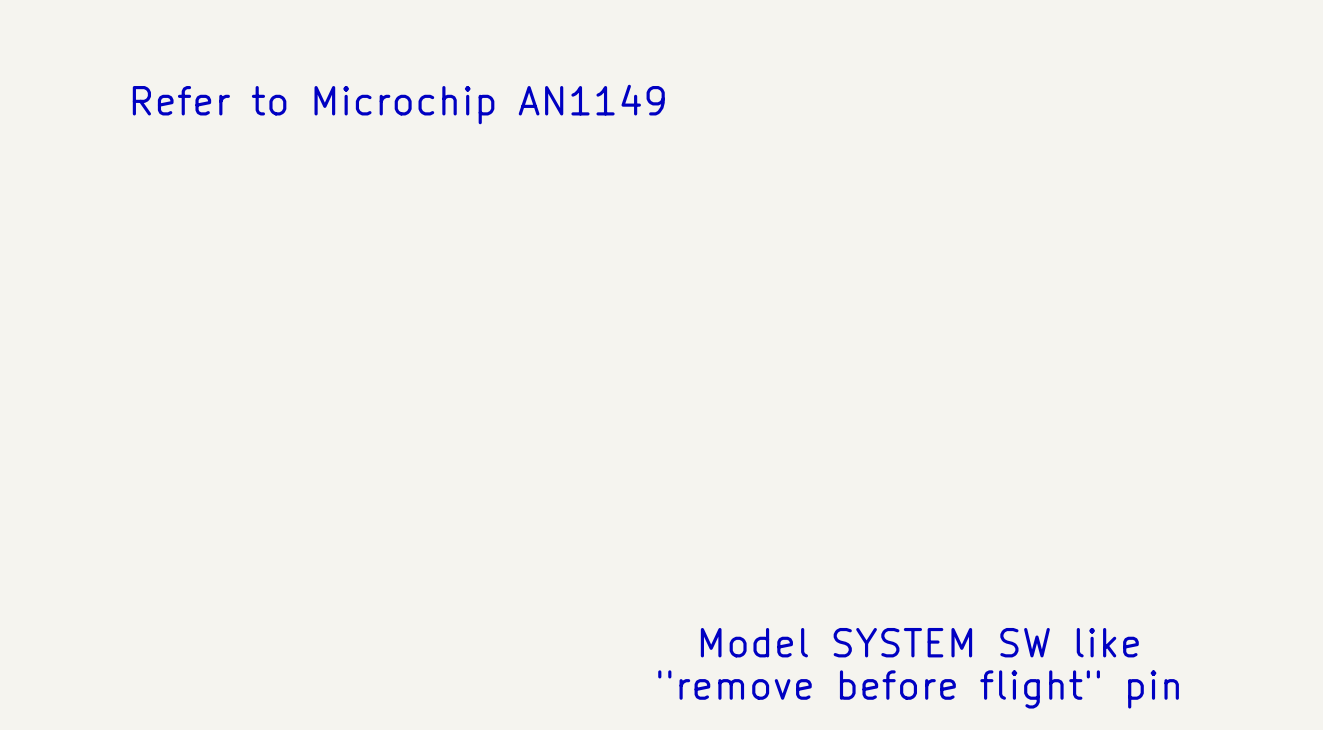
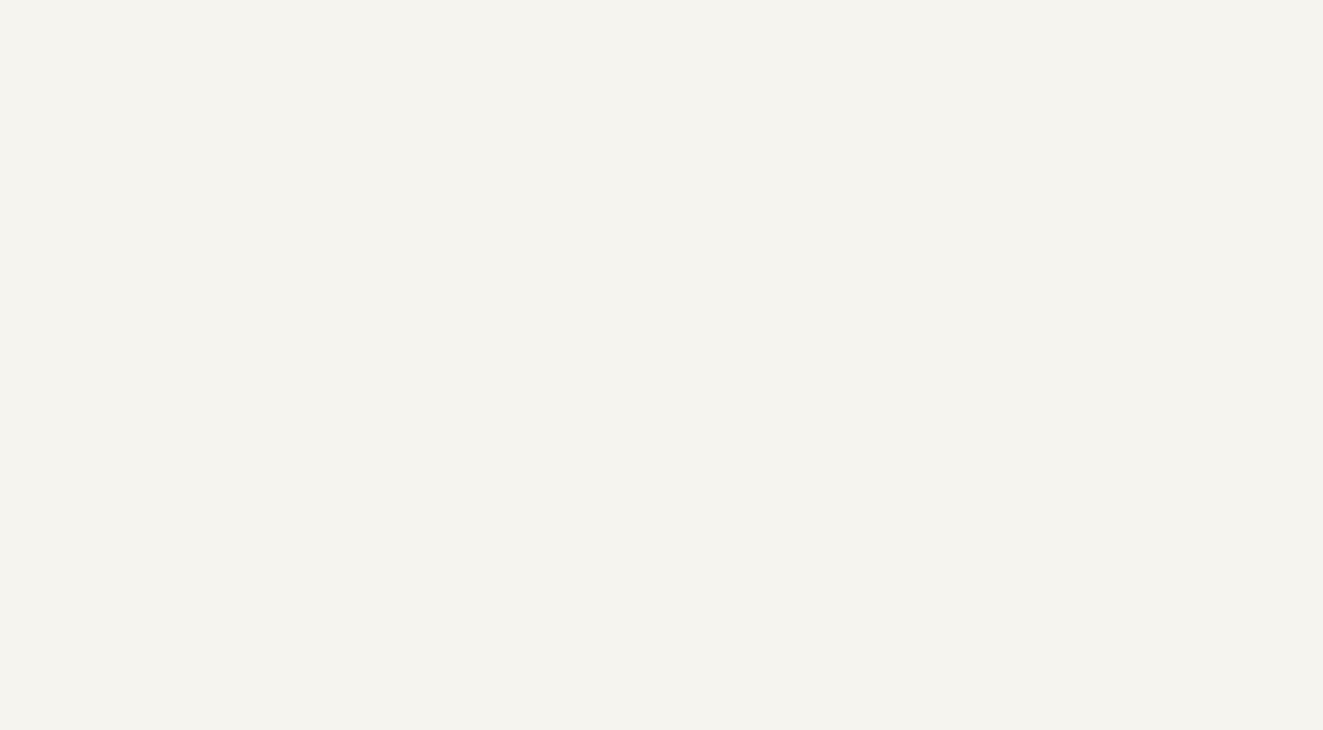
text: Refer to Microchip AN1149 (398, 104) -> none
text: Model SYSTEM SW like (919, 642) -> none
text: "remove before flight" pin (918, 689) -> none

